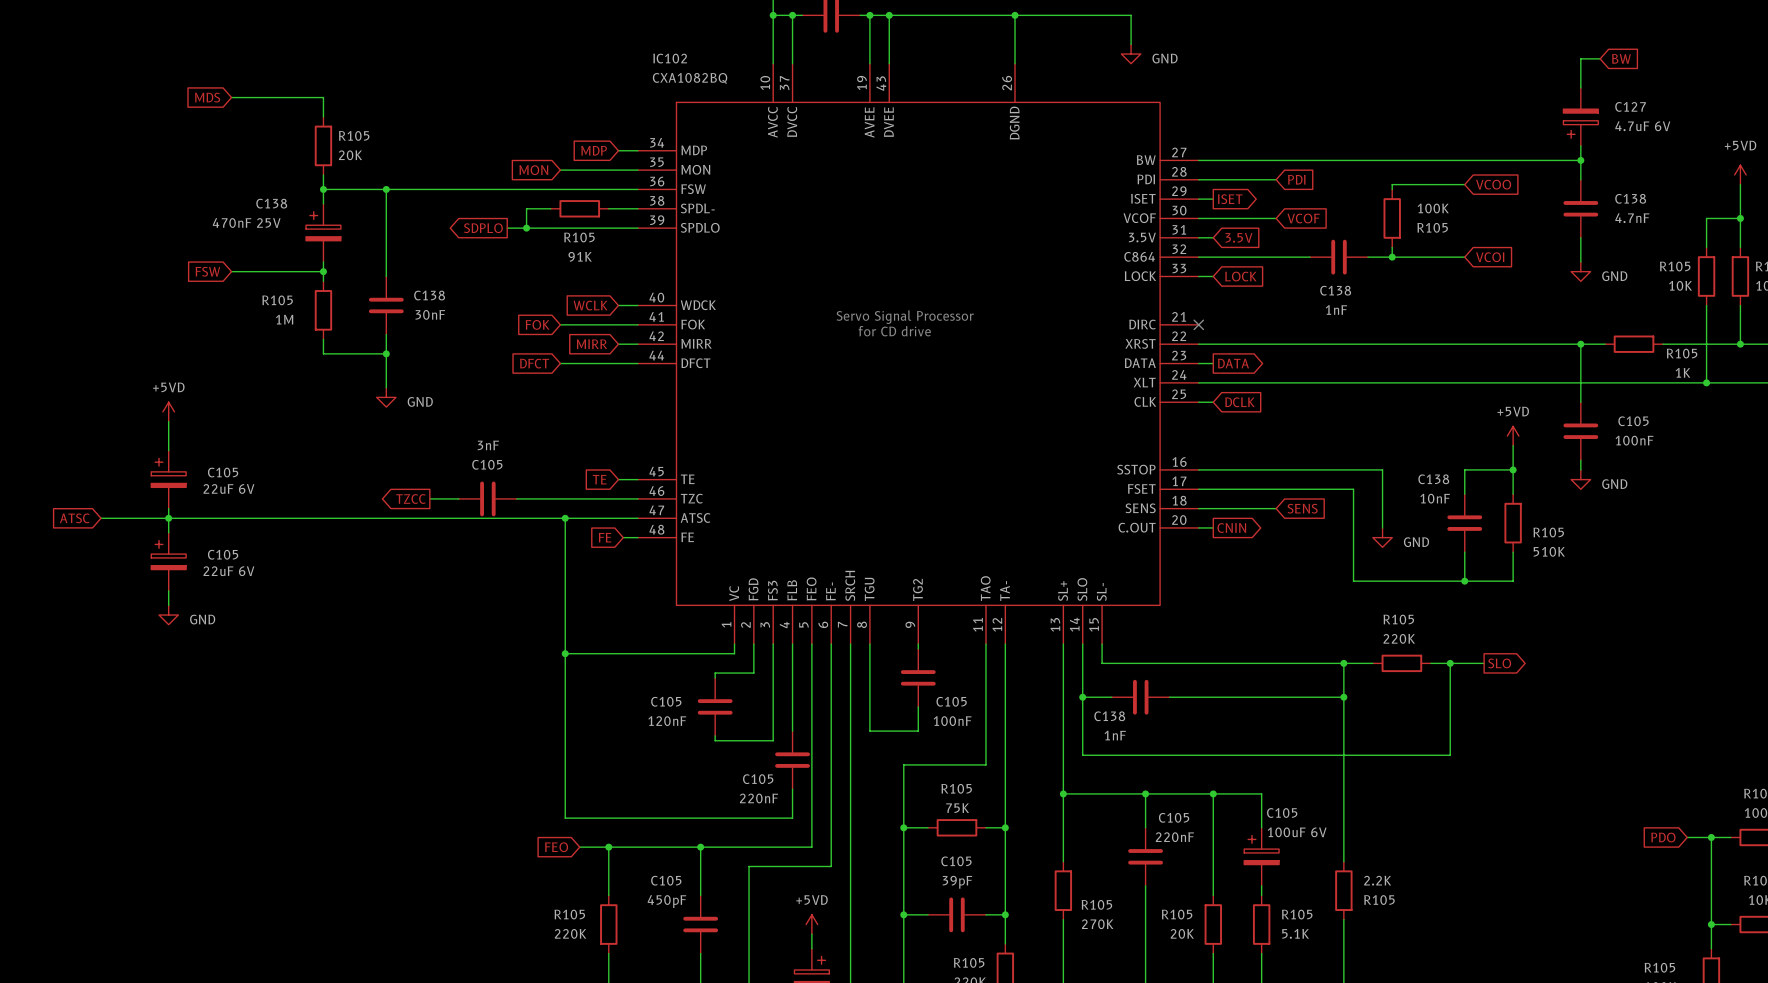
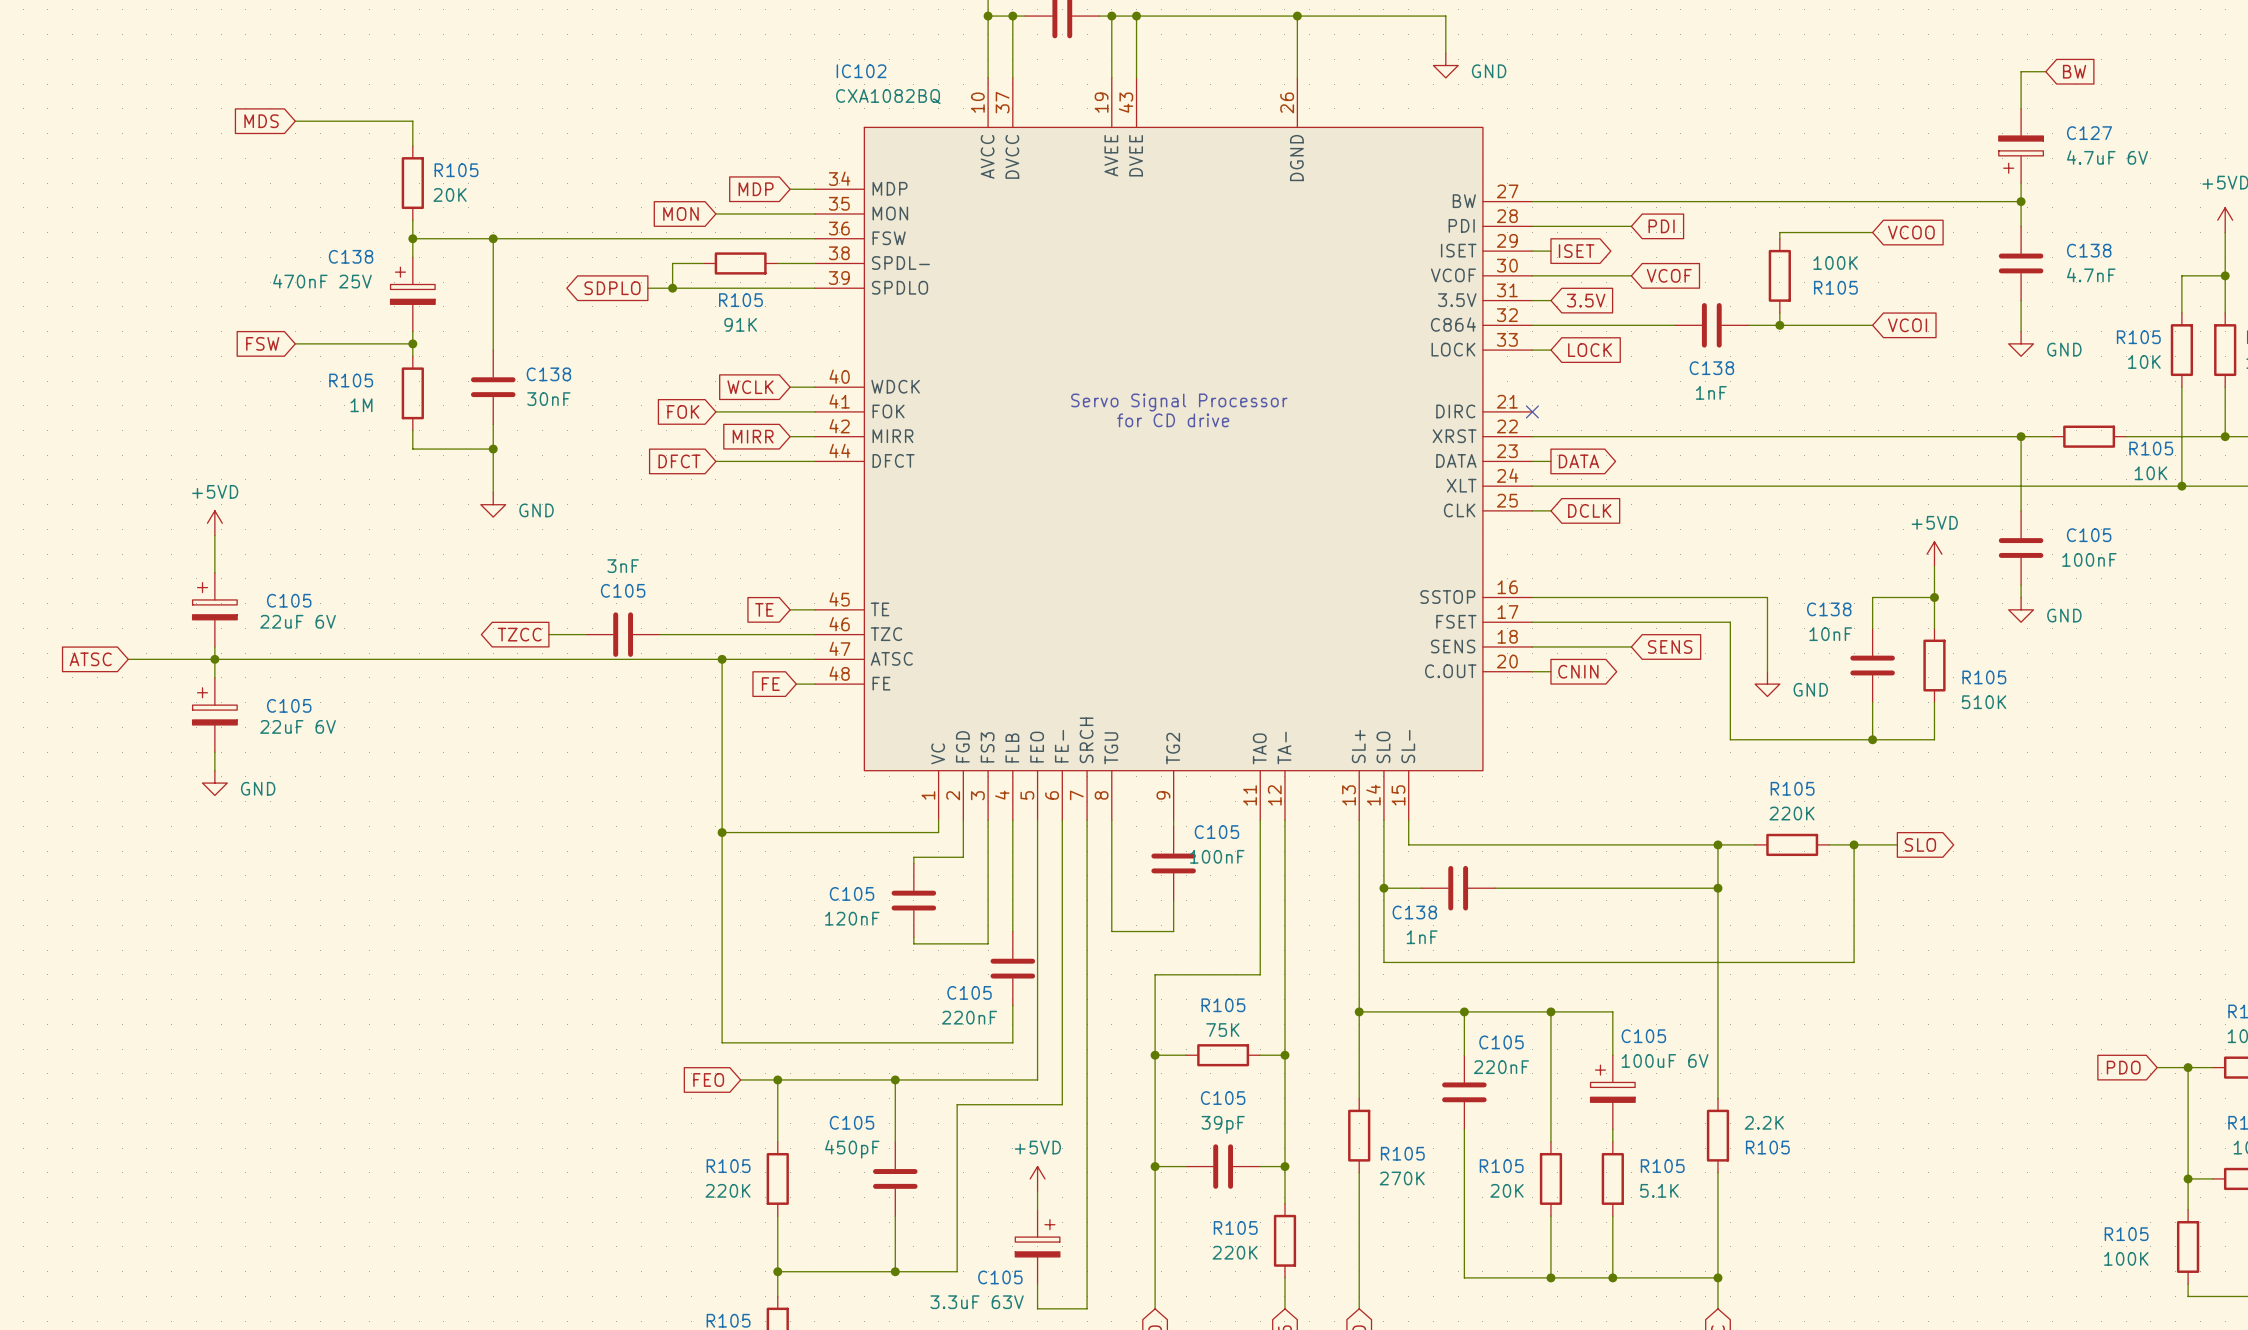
R105 value: 1K (1682, 372) -> 10K (2150, 473)
C105 name position: C105 (951, 701) -> C105 (1216, 832)
C105 value position: 100nF (952, 721) -> 100nF (1217, 856)

